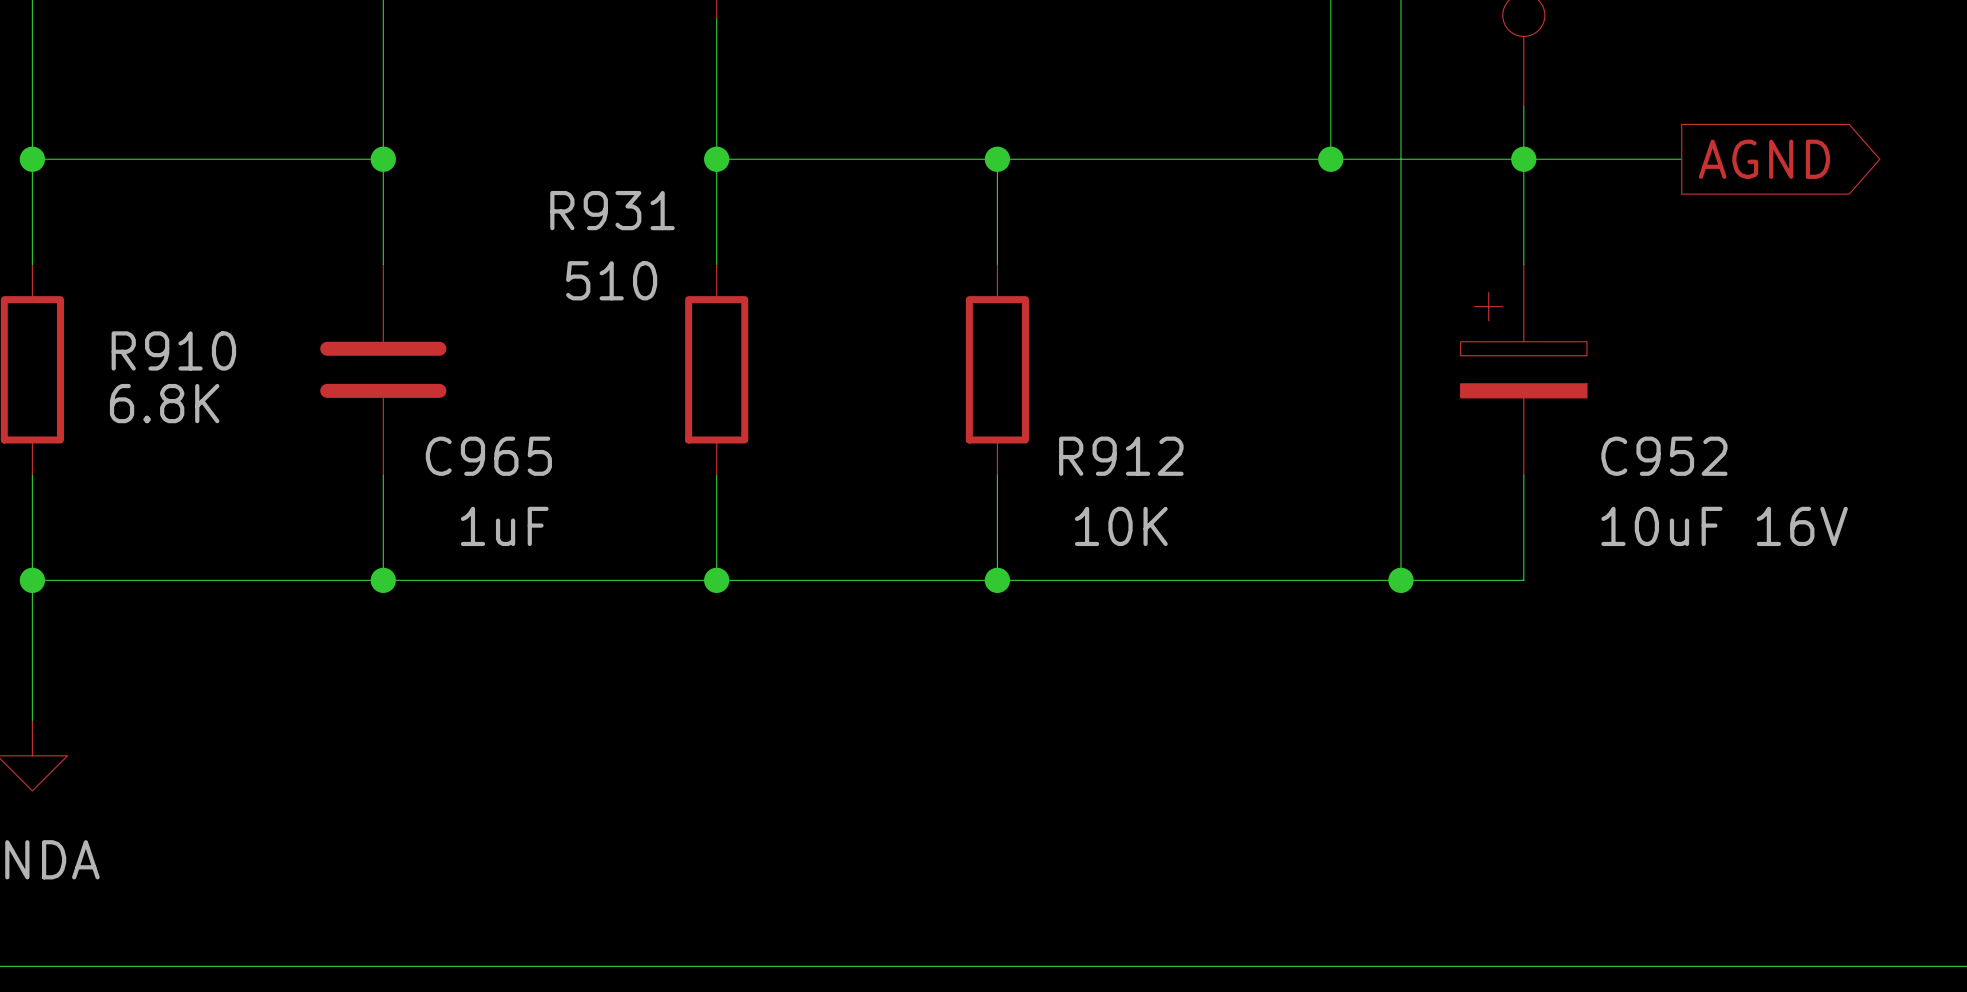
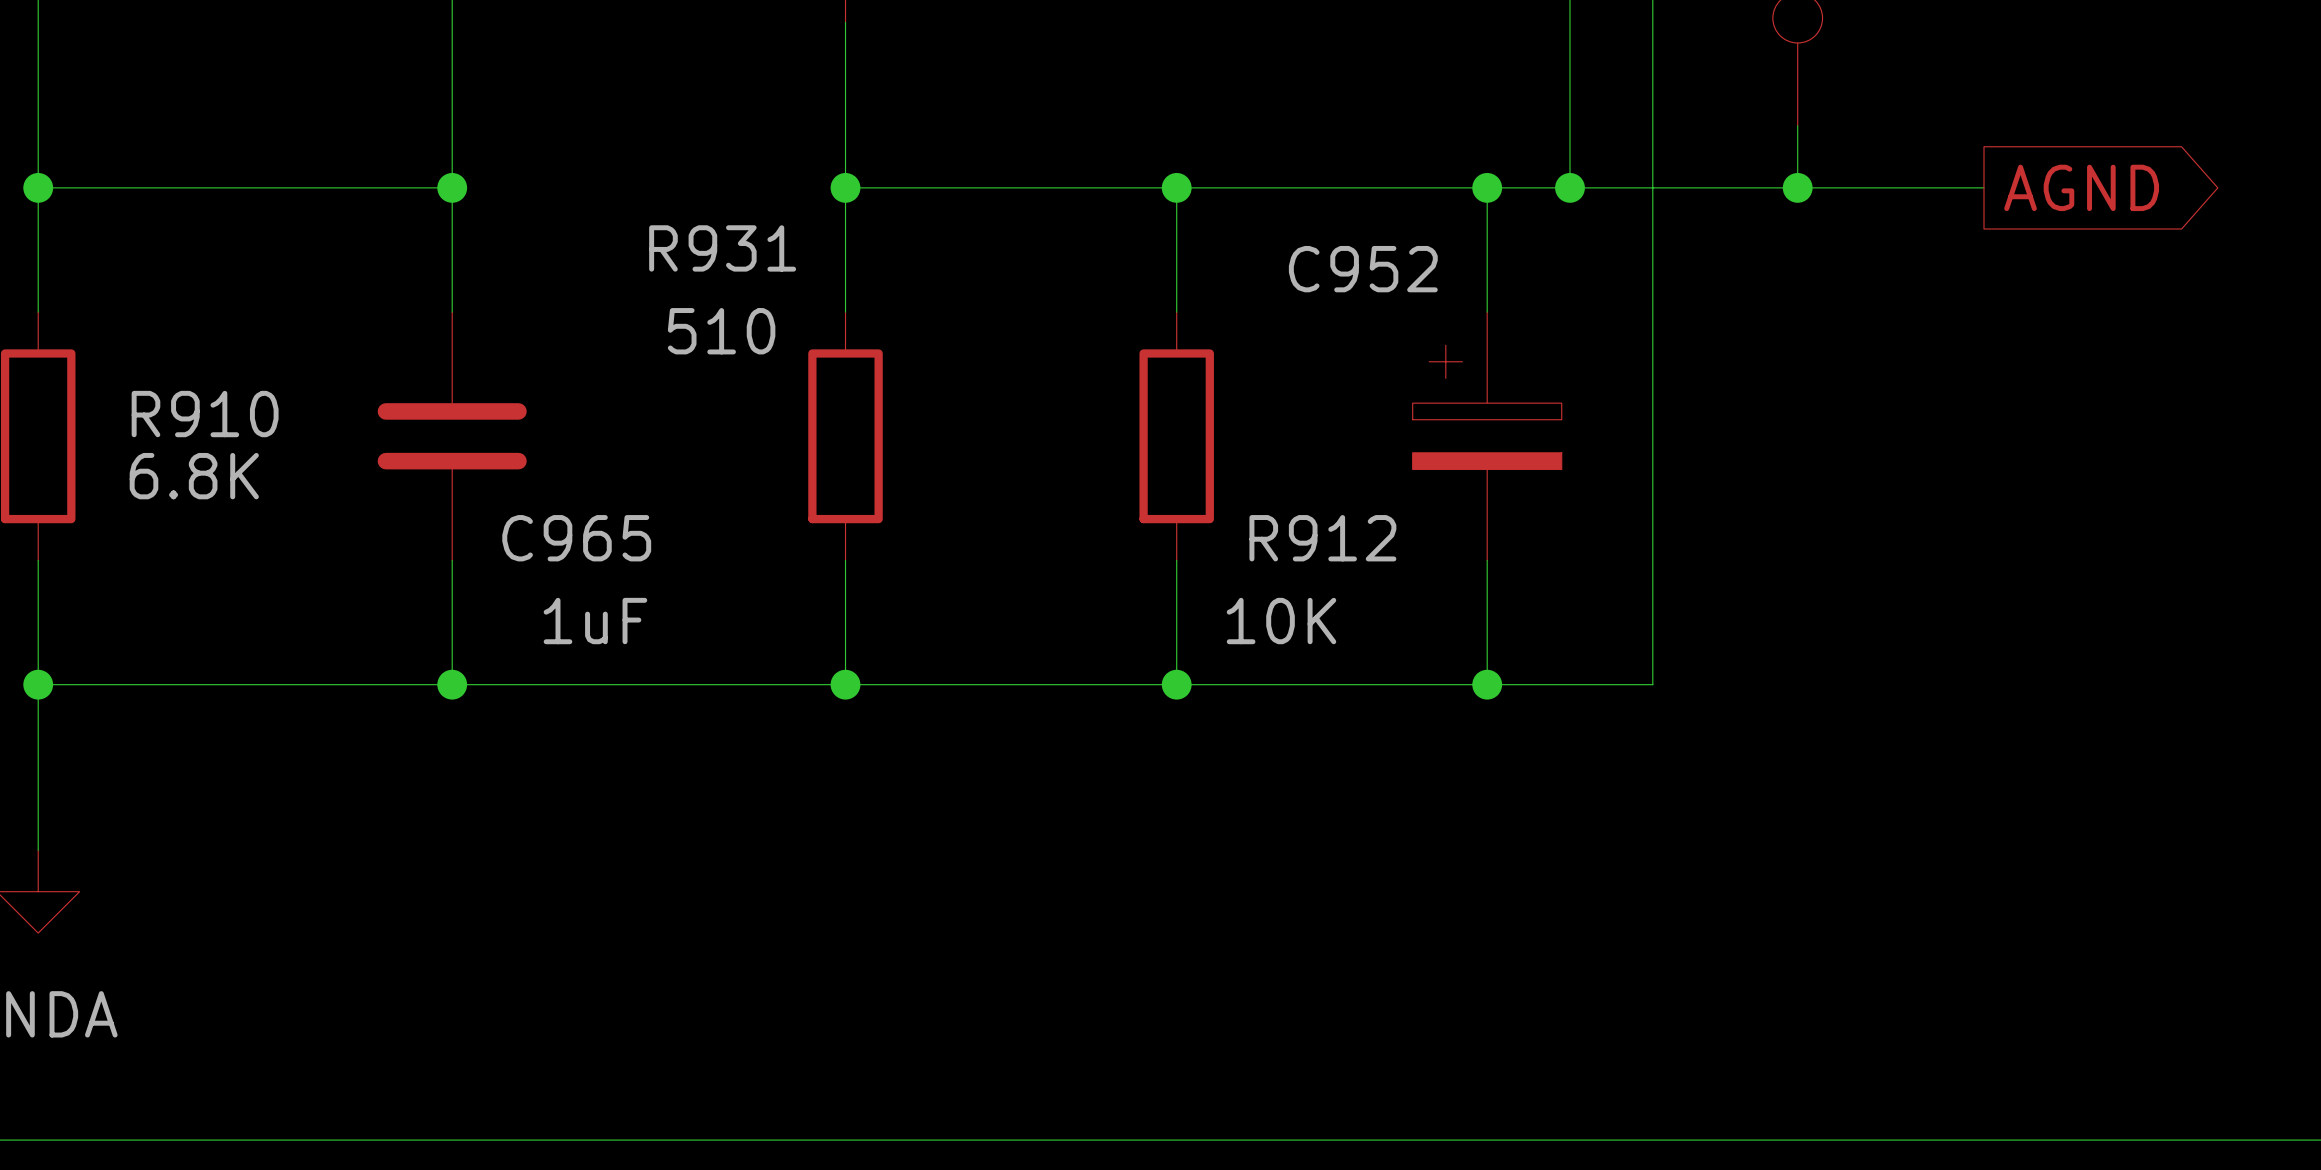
junction: none -> (1487, 187)
wire: (1523, 159) (1523, 264) -> (1487, 187) (1487, 312)
C952 position: (1523, 369) -> (1487, 436)
C952 name position: C952 (1664, 456) -> C952 (1363, 269)
wire: none -> (1487, 560) (1487, 684)
wire: (1523, 475) (1523, 580) (1400, 580) -> none
R912 value position: 10K (1121, 526) -> 10K (1281, 621)
C952 value: 10uF 16V (1724, 526) -> none
junction position: (1400, 580) -> (1487, 684)

